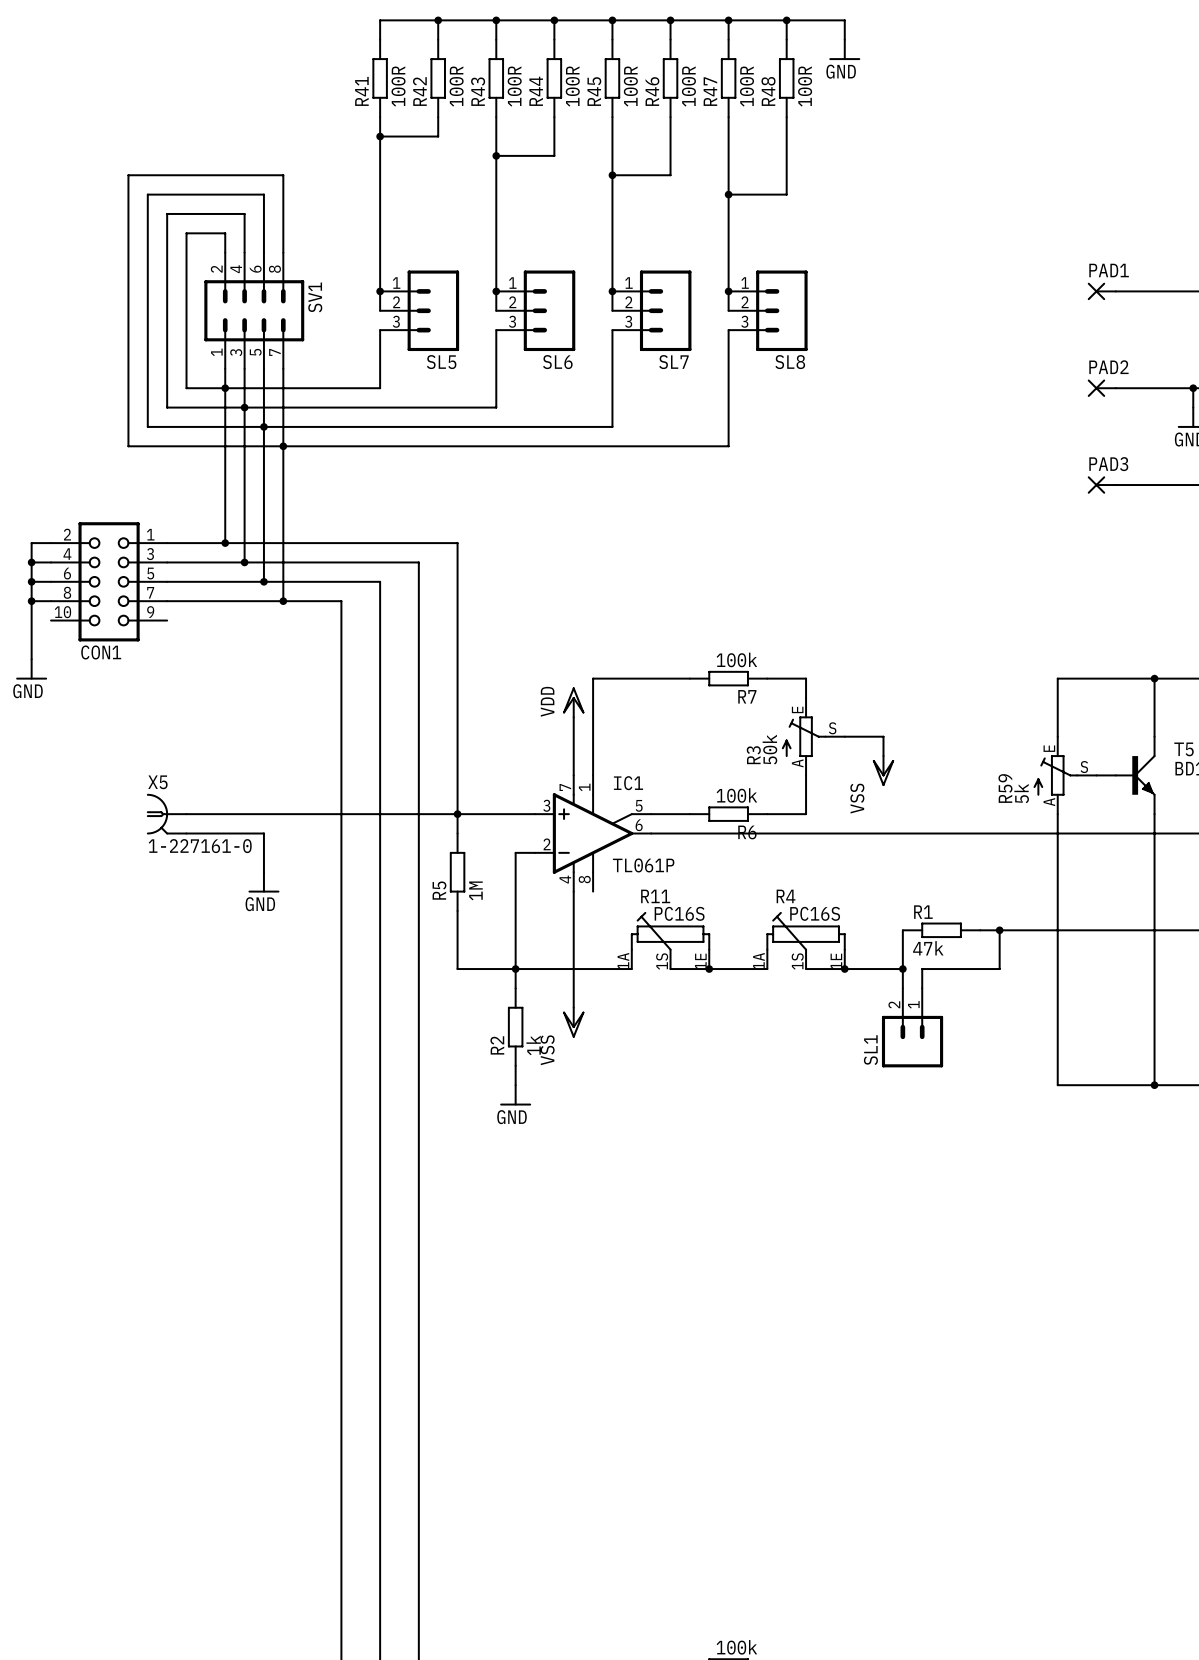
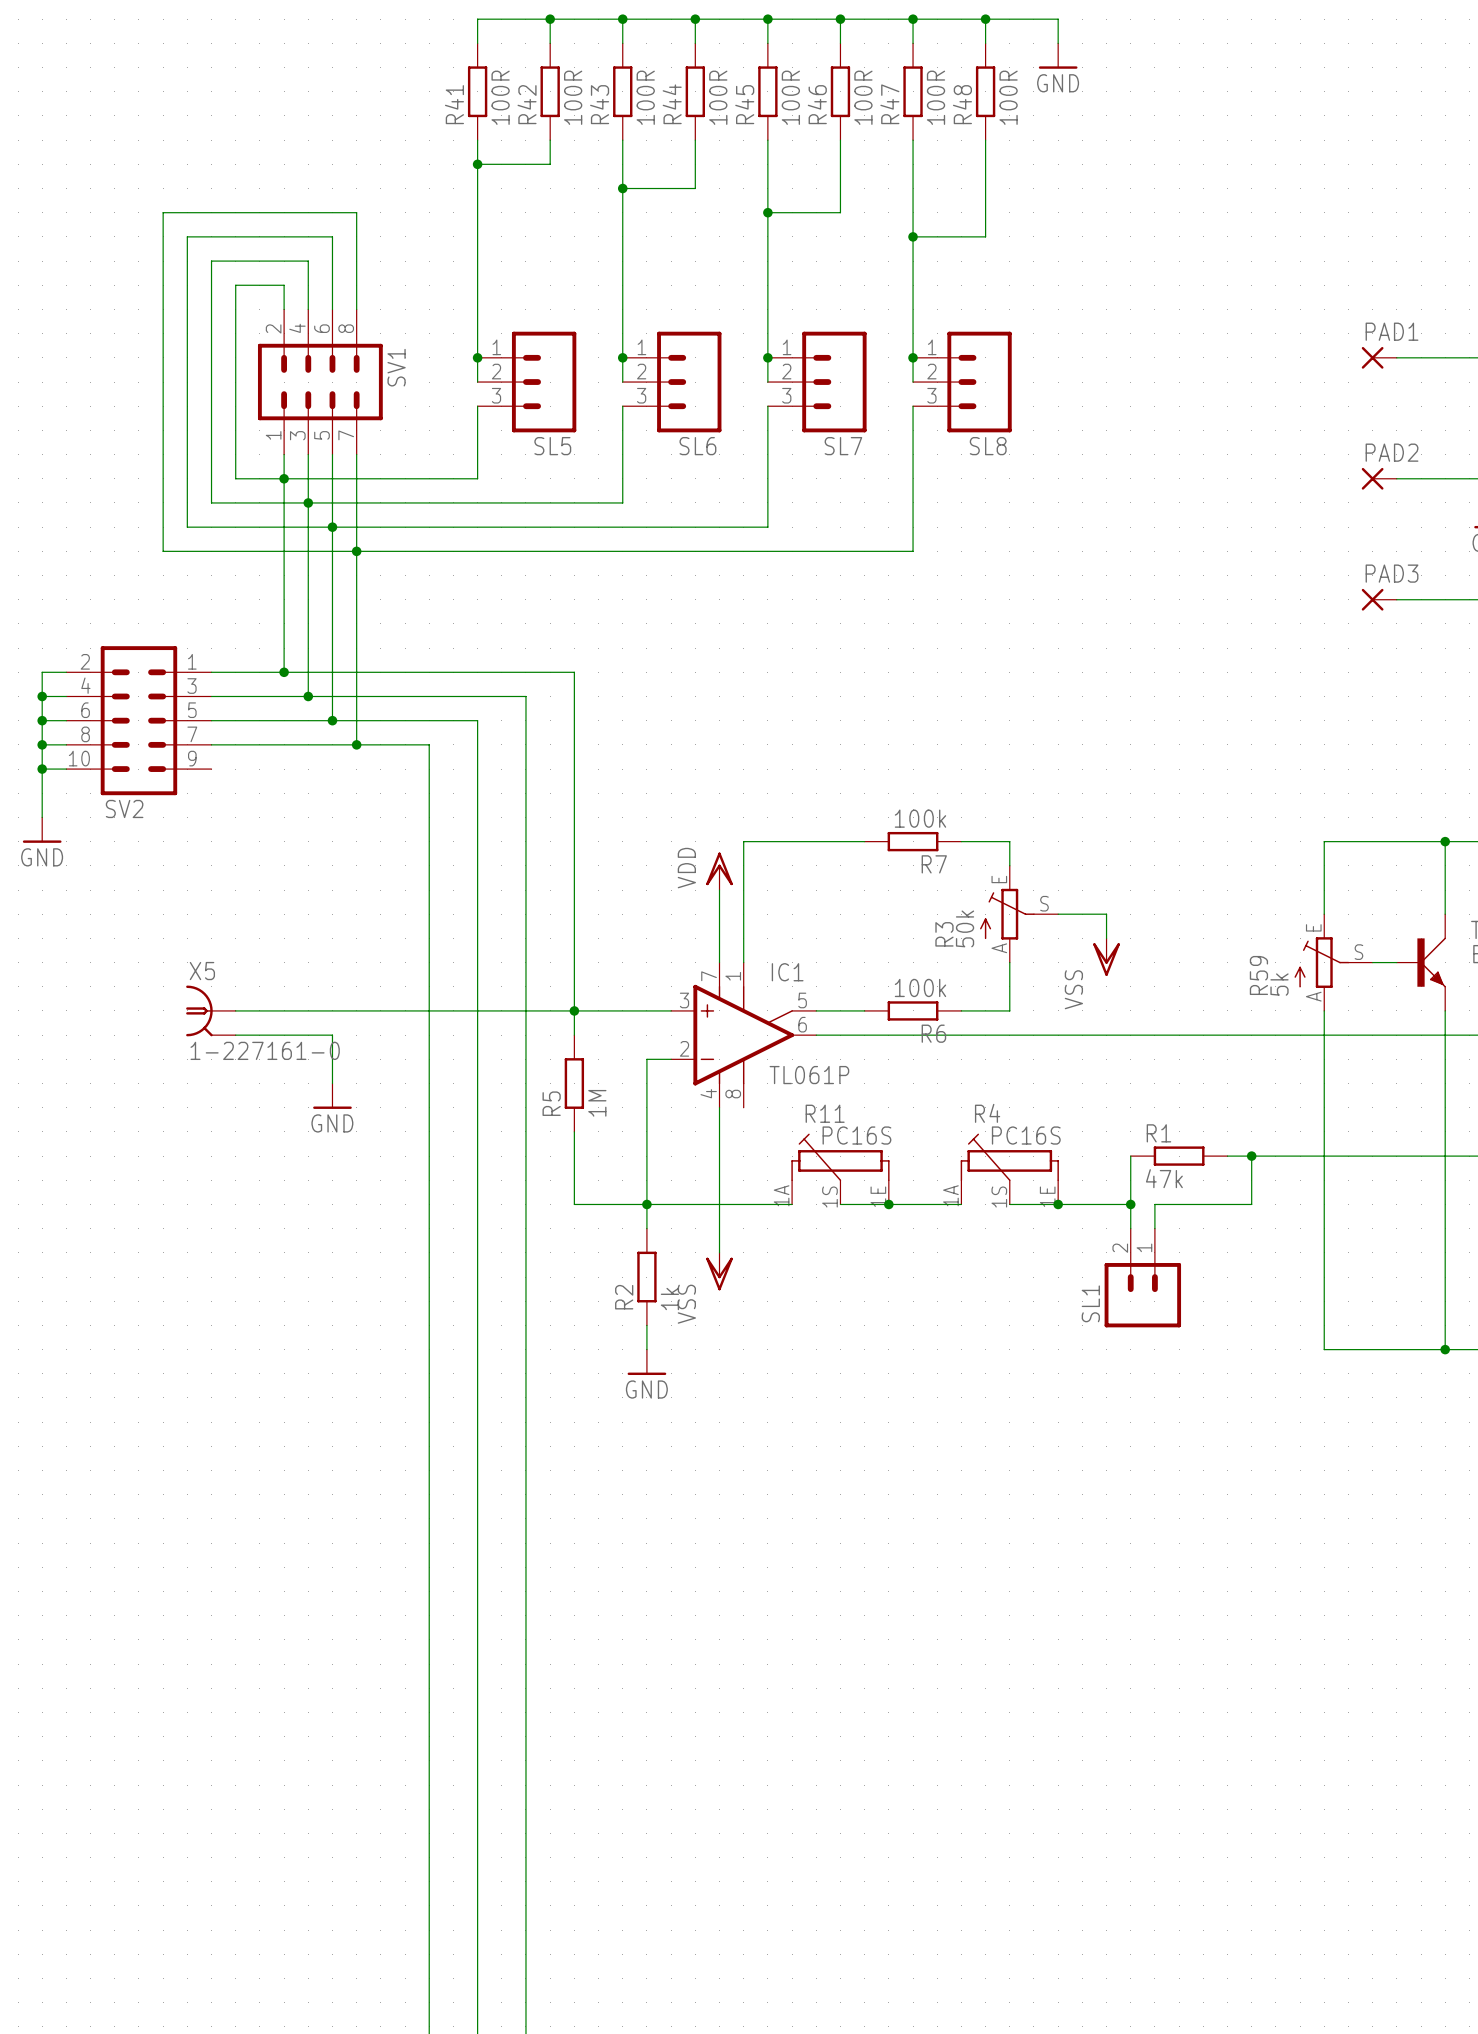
CON1: (109, 581) -> none
SV2: none -> (138, 720)
wire: none -> (42, 769) (66, 769)
junction: none -> (42, 769)

